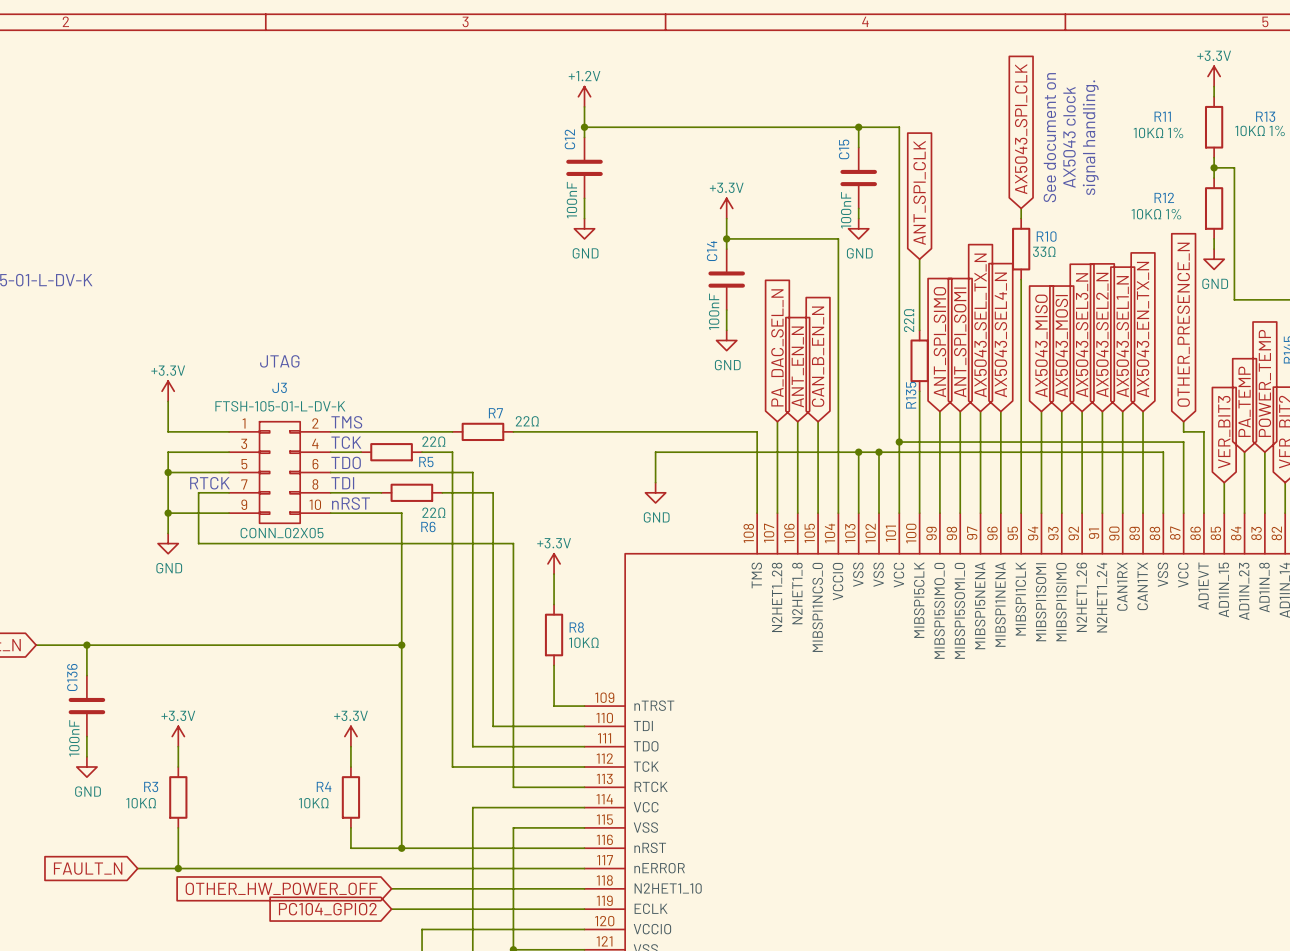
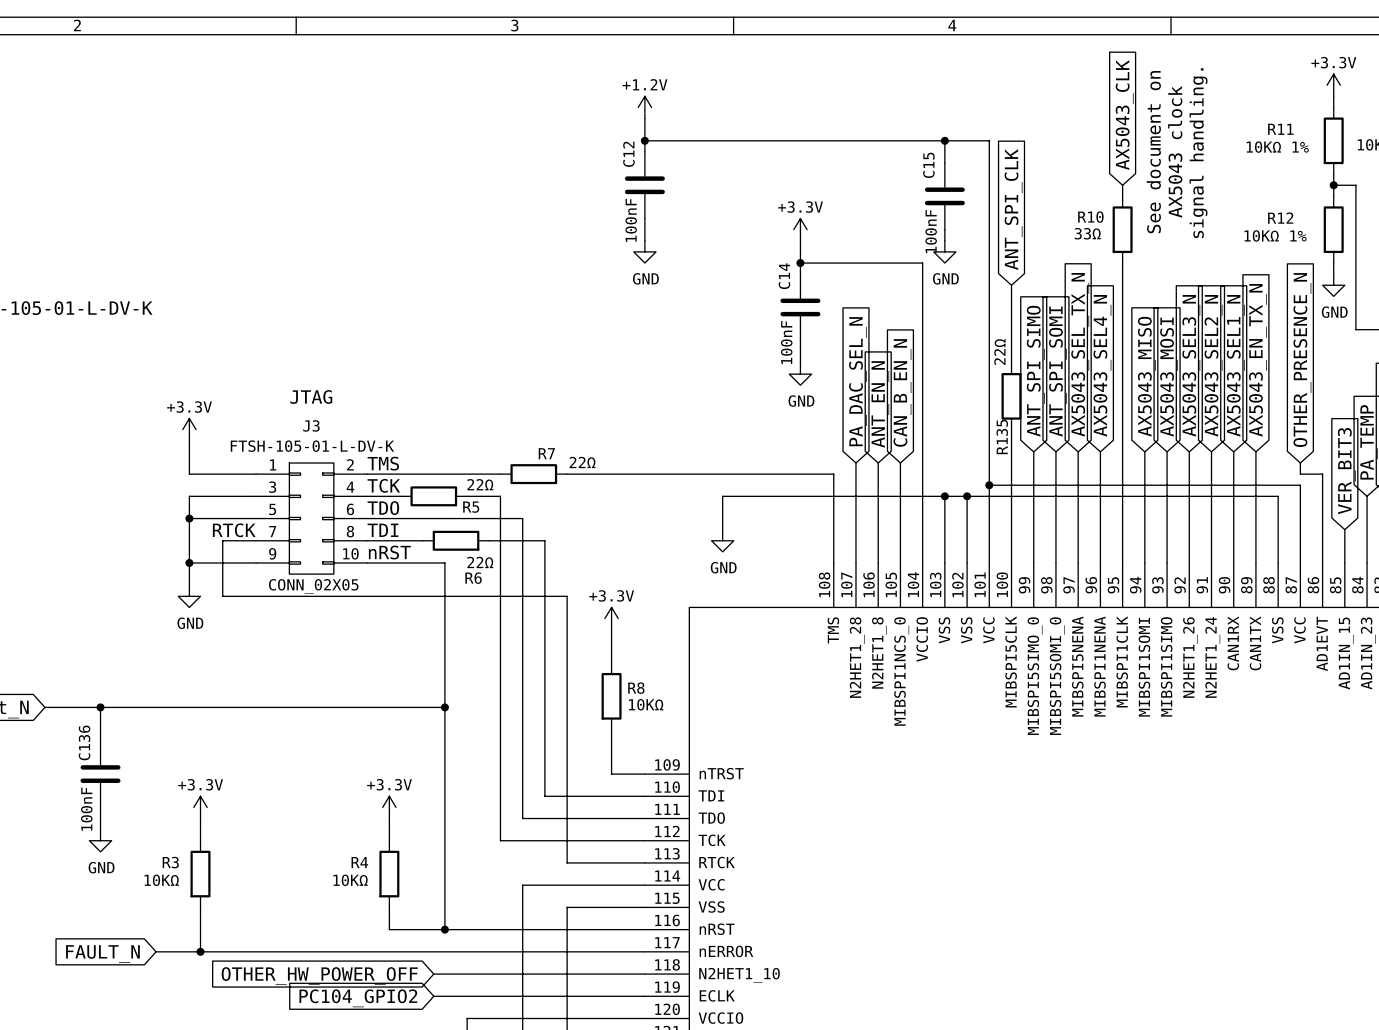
global label: AX5043_SPI_CLK (1021, 129) -> AX5043_CLK (1124, 115)
wire: (1021, 208) (1021, 218) -> (1122, 185) (1122, 196)
R10 name position: R10 (1046, 236) -> R10 (1090, 217)
wire: none -> (1122, 263) (1122, 307)
R10 position: (1021, 249) -> (1122, 229)
R10 value position: 33Ω (1044, 251) -> 33Ω (1087, 233)

